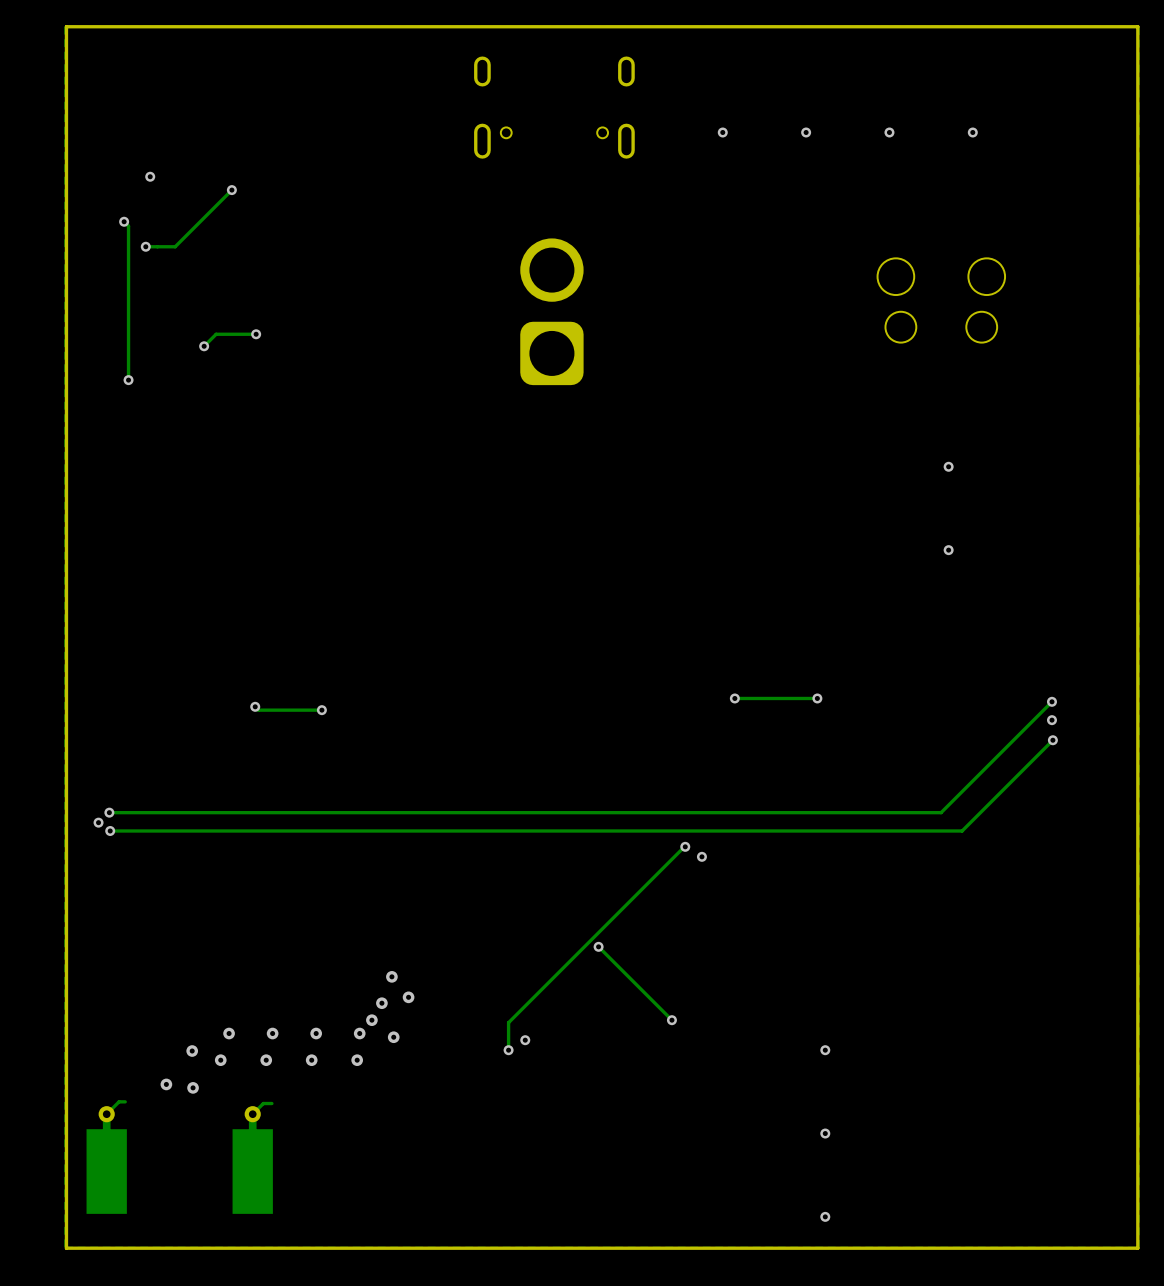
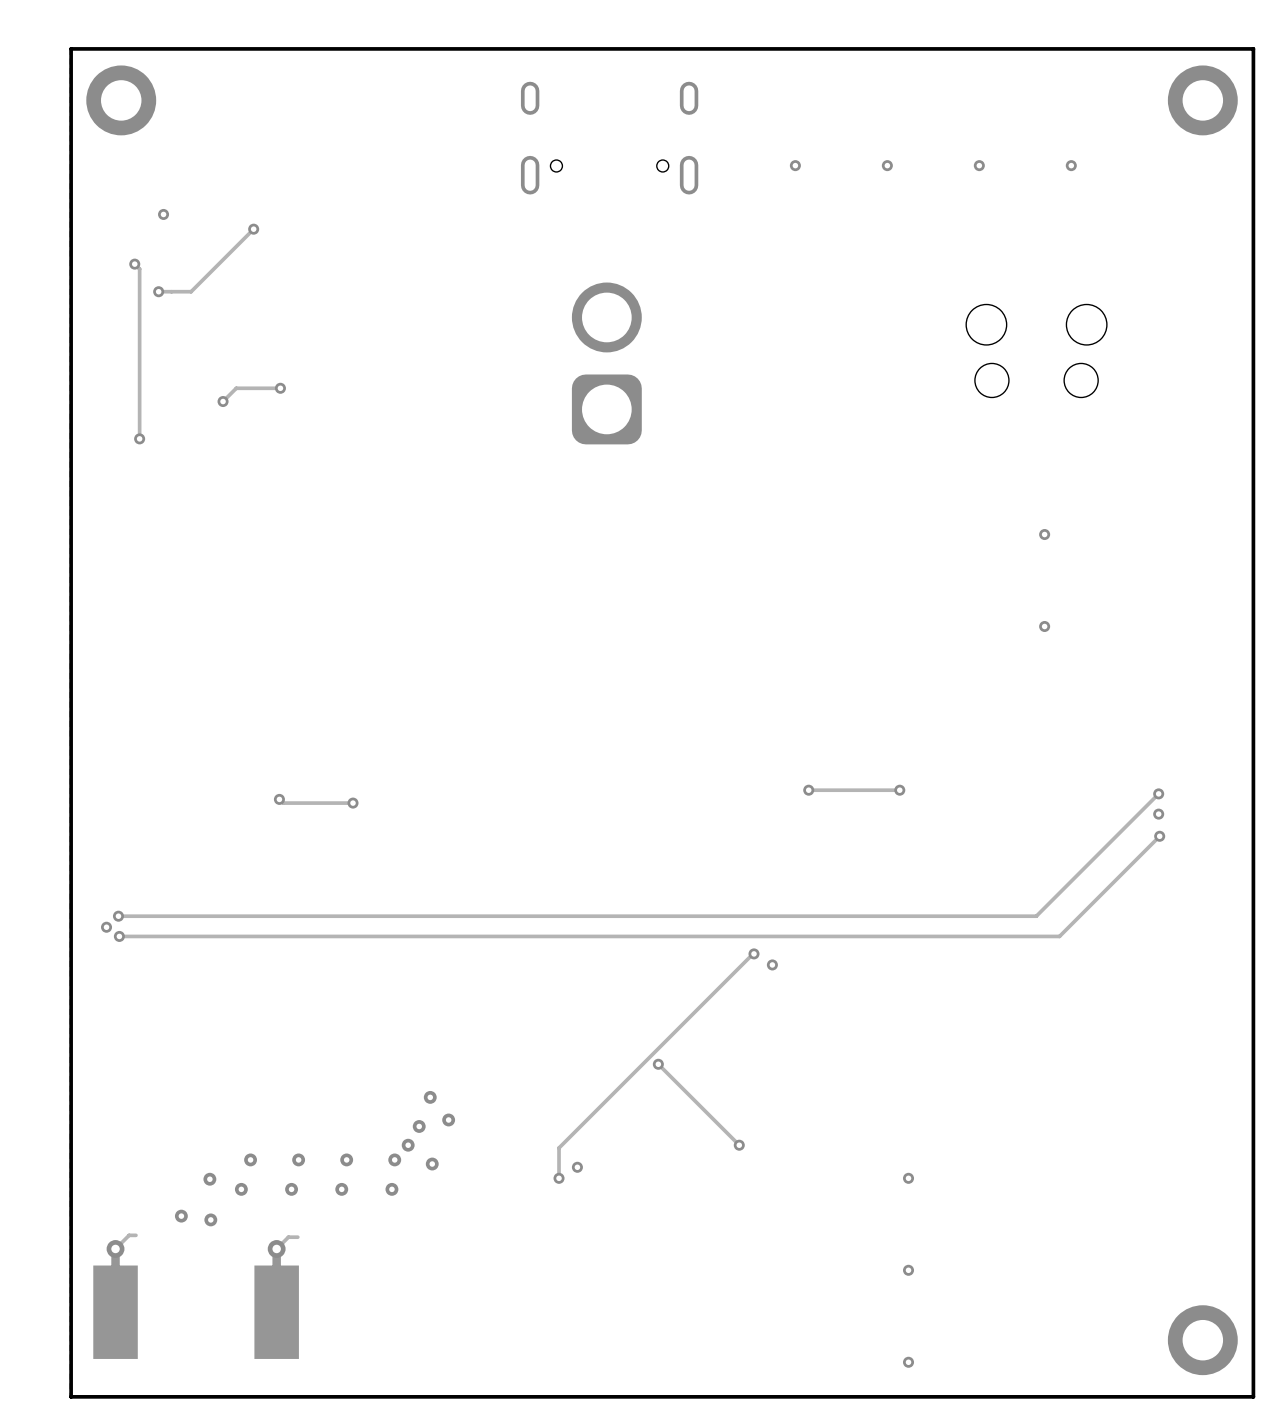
part: none -> (121, 100)
part: none -> (1202, 100)
part: none -> (1202, 1340)

